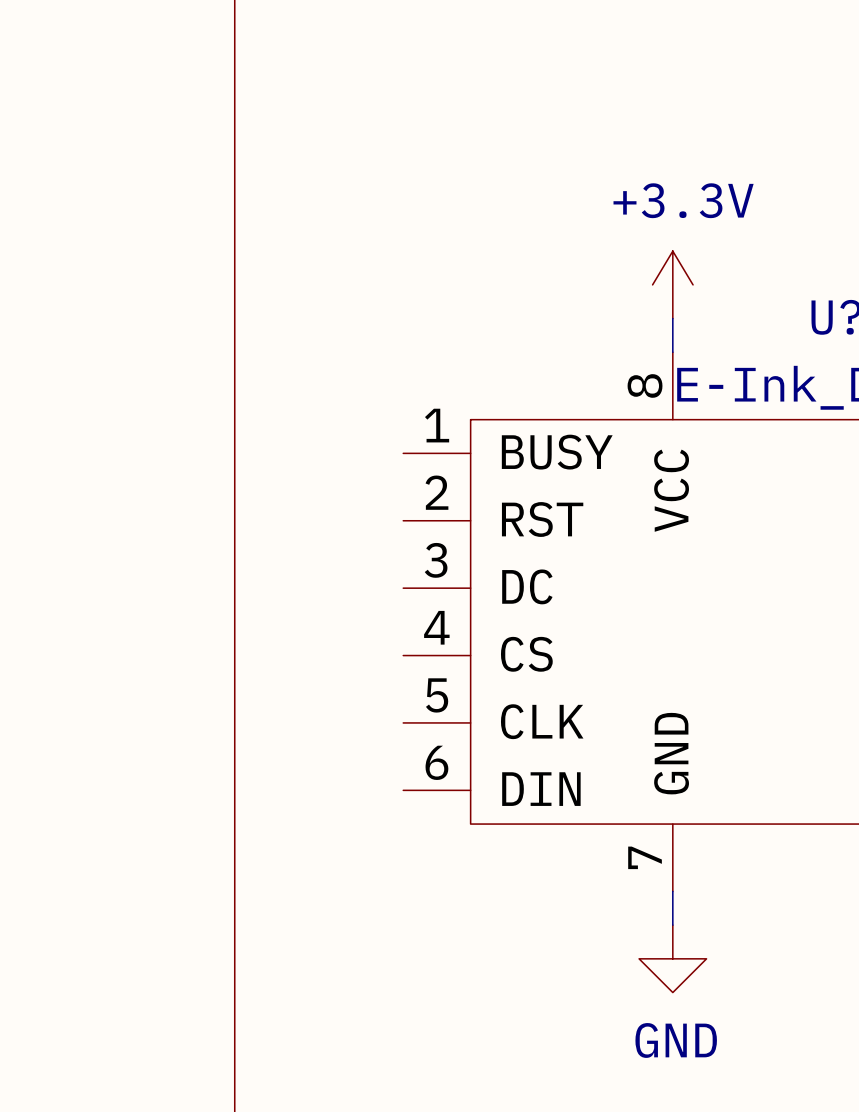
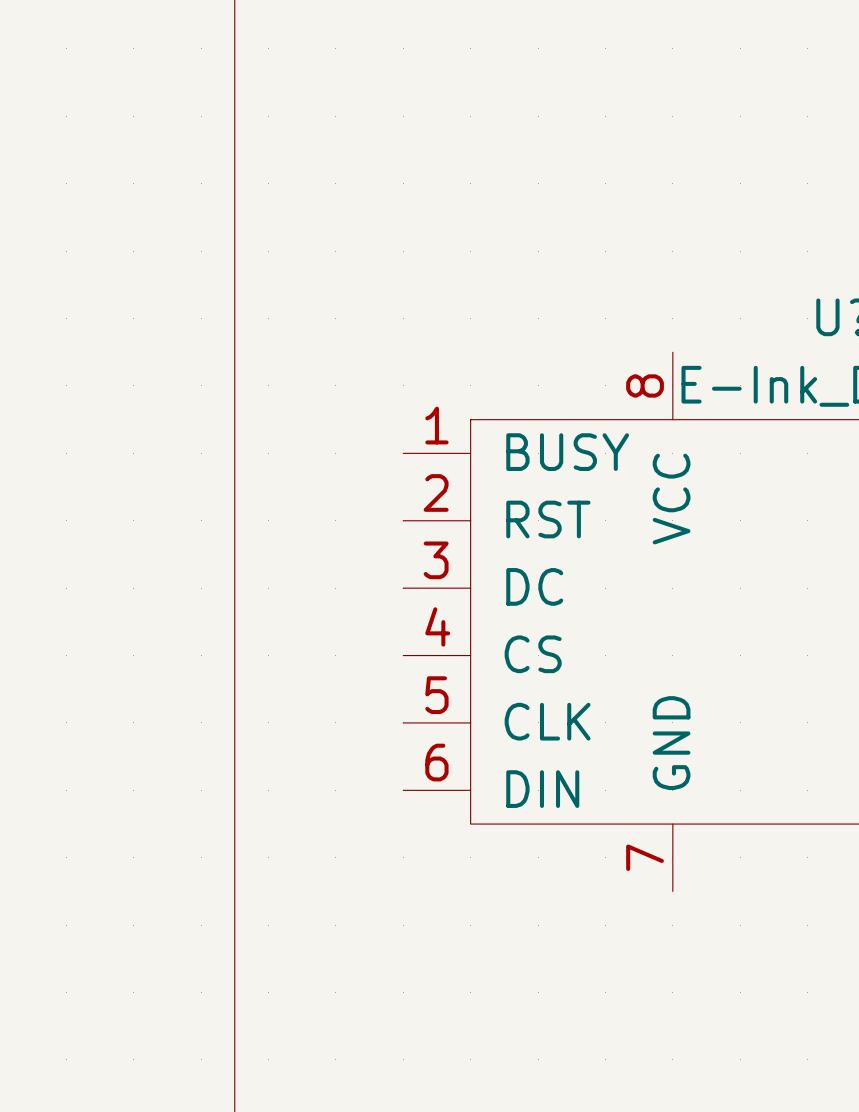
power symbol: +3.3V (672, 284) -> none
wire: (672, 318) (672, 352) -> none
wire: (672, 891) (672, 925) -> none
power symbol: GND (672, 958) -> none

